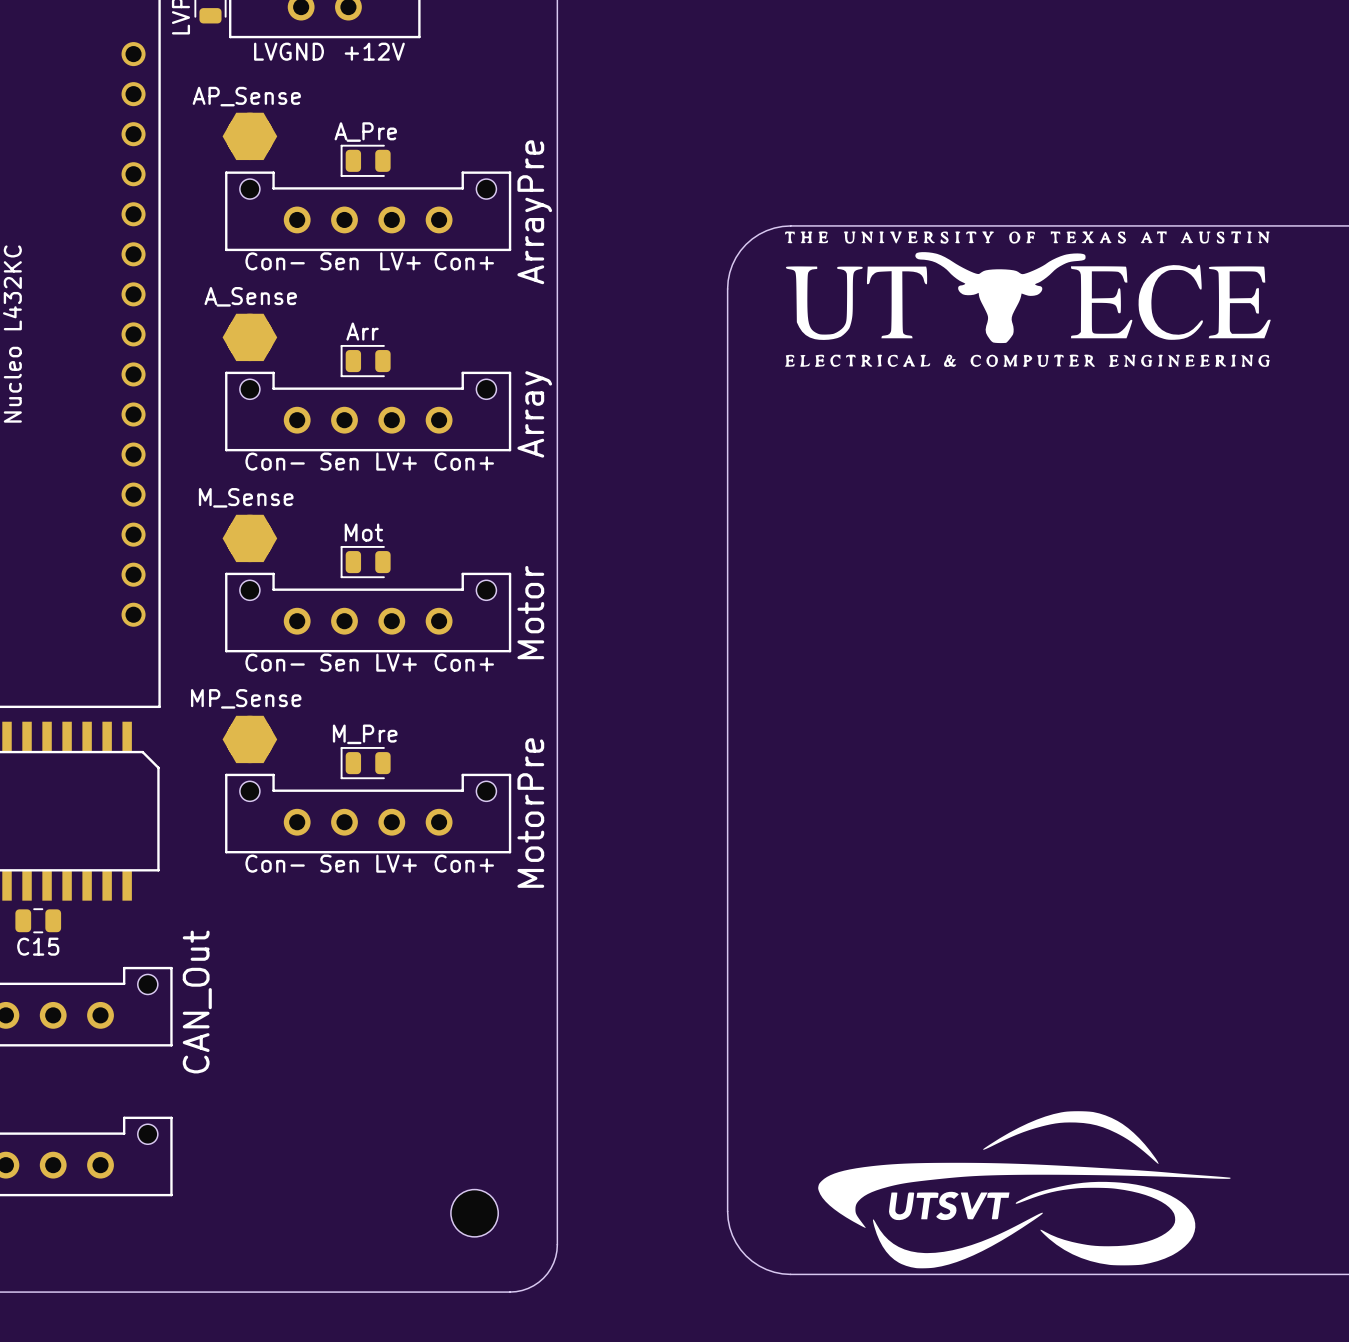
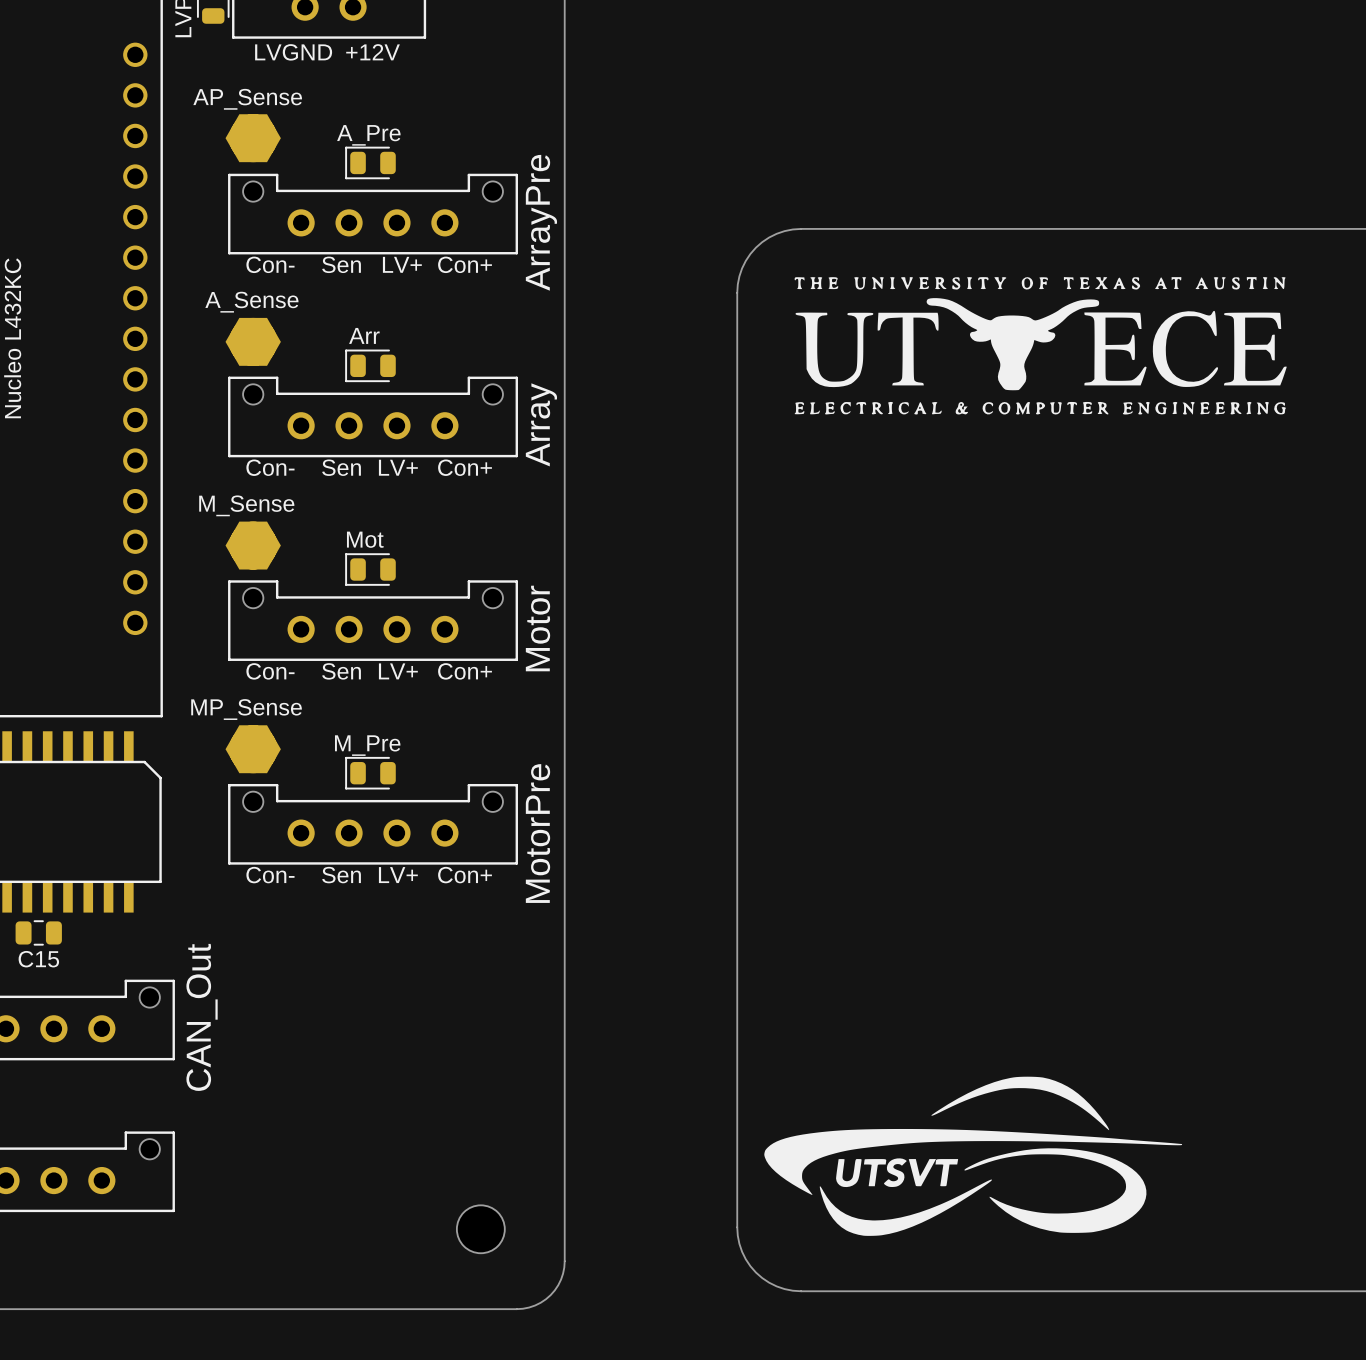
drawing position: (1027, 299) -> (1040, 345)
drawing position: (1024, 1189) -> (973, 1156)

